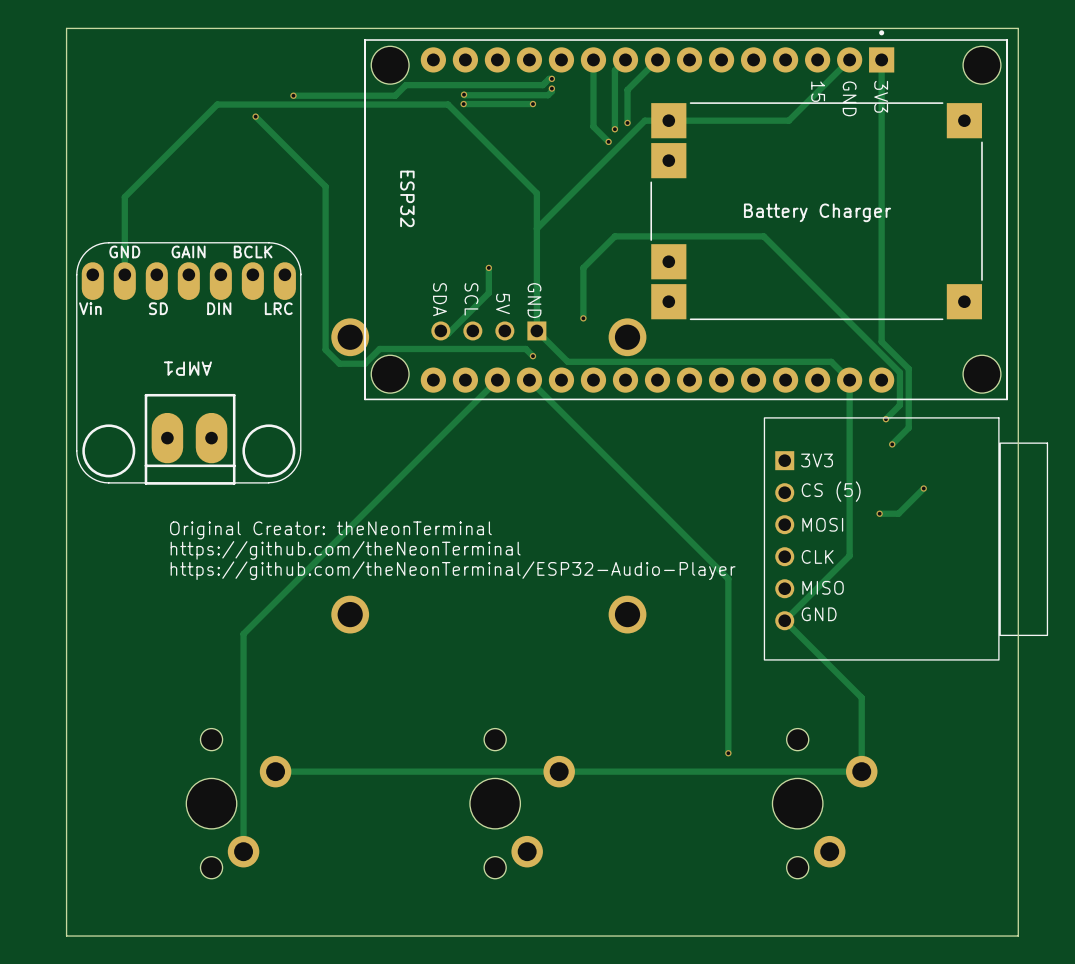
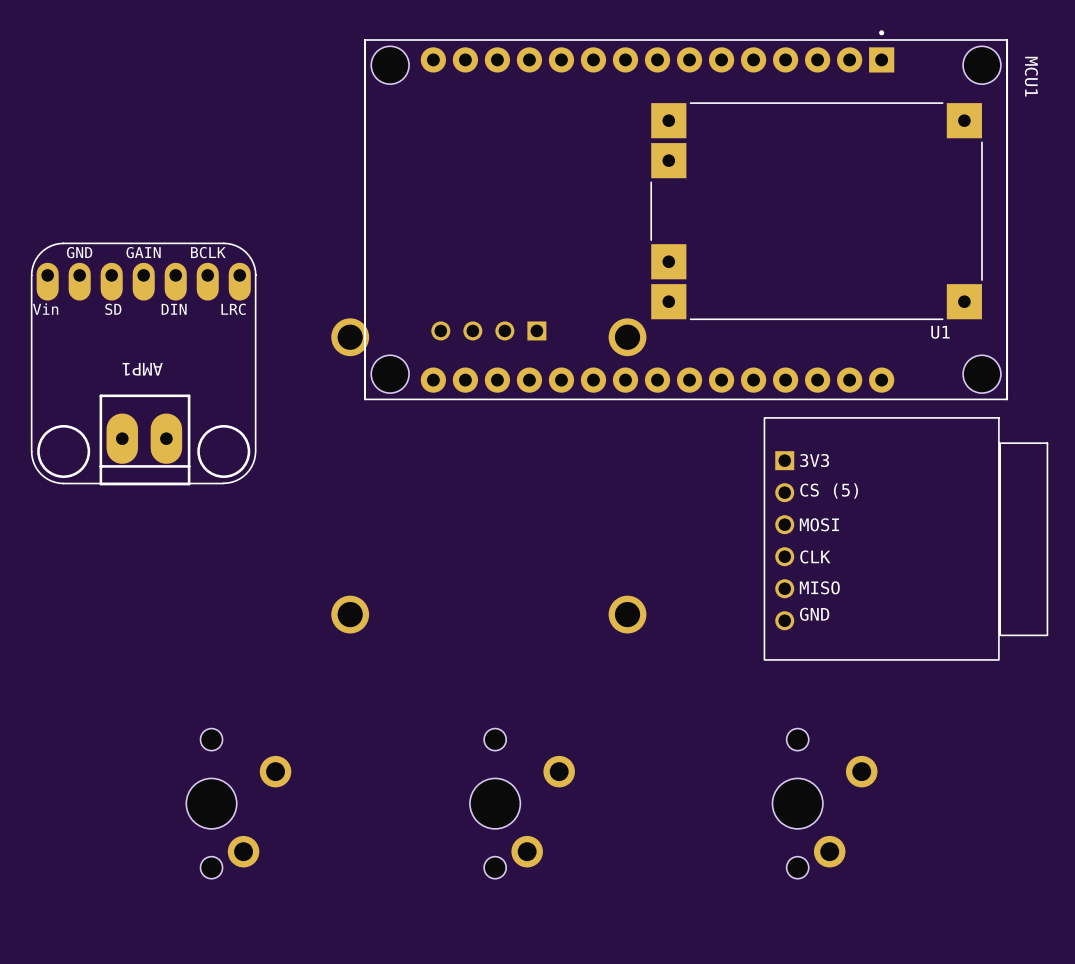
board edge: (1018, 28) (66, 28) (66, 936) (1018, 936) (1018, 28) -> none
track: (593, 59) (593, 126) (608, 141) -> none
track: (625, 59) (614, 70) (614, 129) -> none
track: (657, 59) (627, 89) (627, 122) -> none
track: (849, 59) (788, 120) (644, 120) (536, 228) -> none
track: (881, 59) (881, 341) (908, 368) (908, 427) (892, 444) -> none
track: (551, 78) (549, 78) (542, 85) (405, 85) (395, 95) (293, 95) -> none
via: (551, 78) -> none
track: (551, 88) (548, 95) (464, 94) -> none
via: (551, 88) -> none
text: 15 (818, 91) -> none
via: (464, 94) -> none
via: (293, 95) -> none
text: 3V3 (881, 96) -> none
text: GND (849, 98) -> none
via: (463, 104) -> none
track: (532, 104) (463, 104) -> none
via: (532, 104) -> none
track: (255, 116) (325, 186) (325, 349) (339, 363) (364, 363) (379, 348) (525, 348) (532, 356) -> none
via: (255, 116) -> none
via: (627, 122) -> none
via: (614, 129) -> none
via: (608, 141) -> none
ESP32 name: ESP32 (407, 198) -> MCU1 (1031, 76)
Battery Charger name: Battery Charger (817, 212) -> U1 (940, 332)
track: (488, 267) (488, 293) (448, 333) (440, 333) -> none
via: (488, 267) -> none
track: (124, 274) (124, 197) (217, 104) (448, 104) (536, 193) (536, 330) (567, 361) (831, 361) (849, 380) (849, 555) (784, 620) (861, 697) (861, 771) (275, 771) -> none
text: SDA (439, 299) -> none
text: SCL (471, 299) -> none
text: GND (534, 300) -> none
text: 5V (503, 303) -> none
track: (583, 318) (583, 267) (614, 236) (763, 236) (899, 372) (899, 405) (885, 419) -> none
via: (583, 318) -> none
via: (532, 356) -> none
AMP1 position: (188, 363) -> (143, 364)
track: (497, 380) (243, 633) (243, 851) -> none
track: (529, 380) (728, 579) (728, 753) -> none
via: (885, 419) -> none
via: (892, 444) -> none
track: (923, 488) (898, 513) (879, 513) -> none
via: (923, 488) -> none
via: (879, 513) -> none
text: Original Creator: theNeonTerminal (330, 530) -> none
text: https://github.com/theNeonTerminal (345, 550) -> none
text: https://github.com/theNeonTerminal/ESP32-Audio-Player (453, 570) -> none
via: (728, 753) -> none

